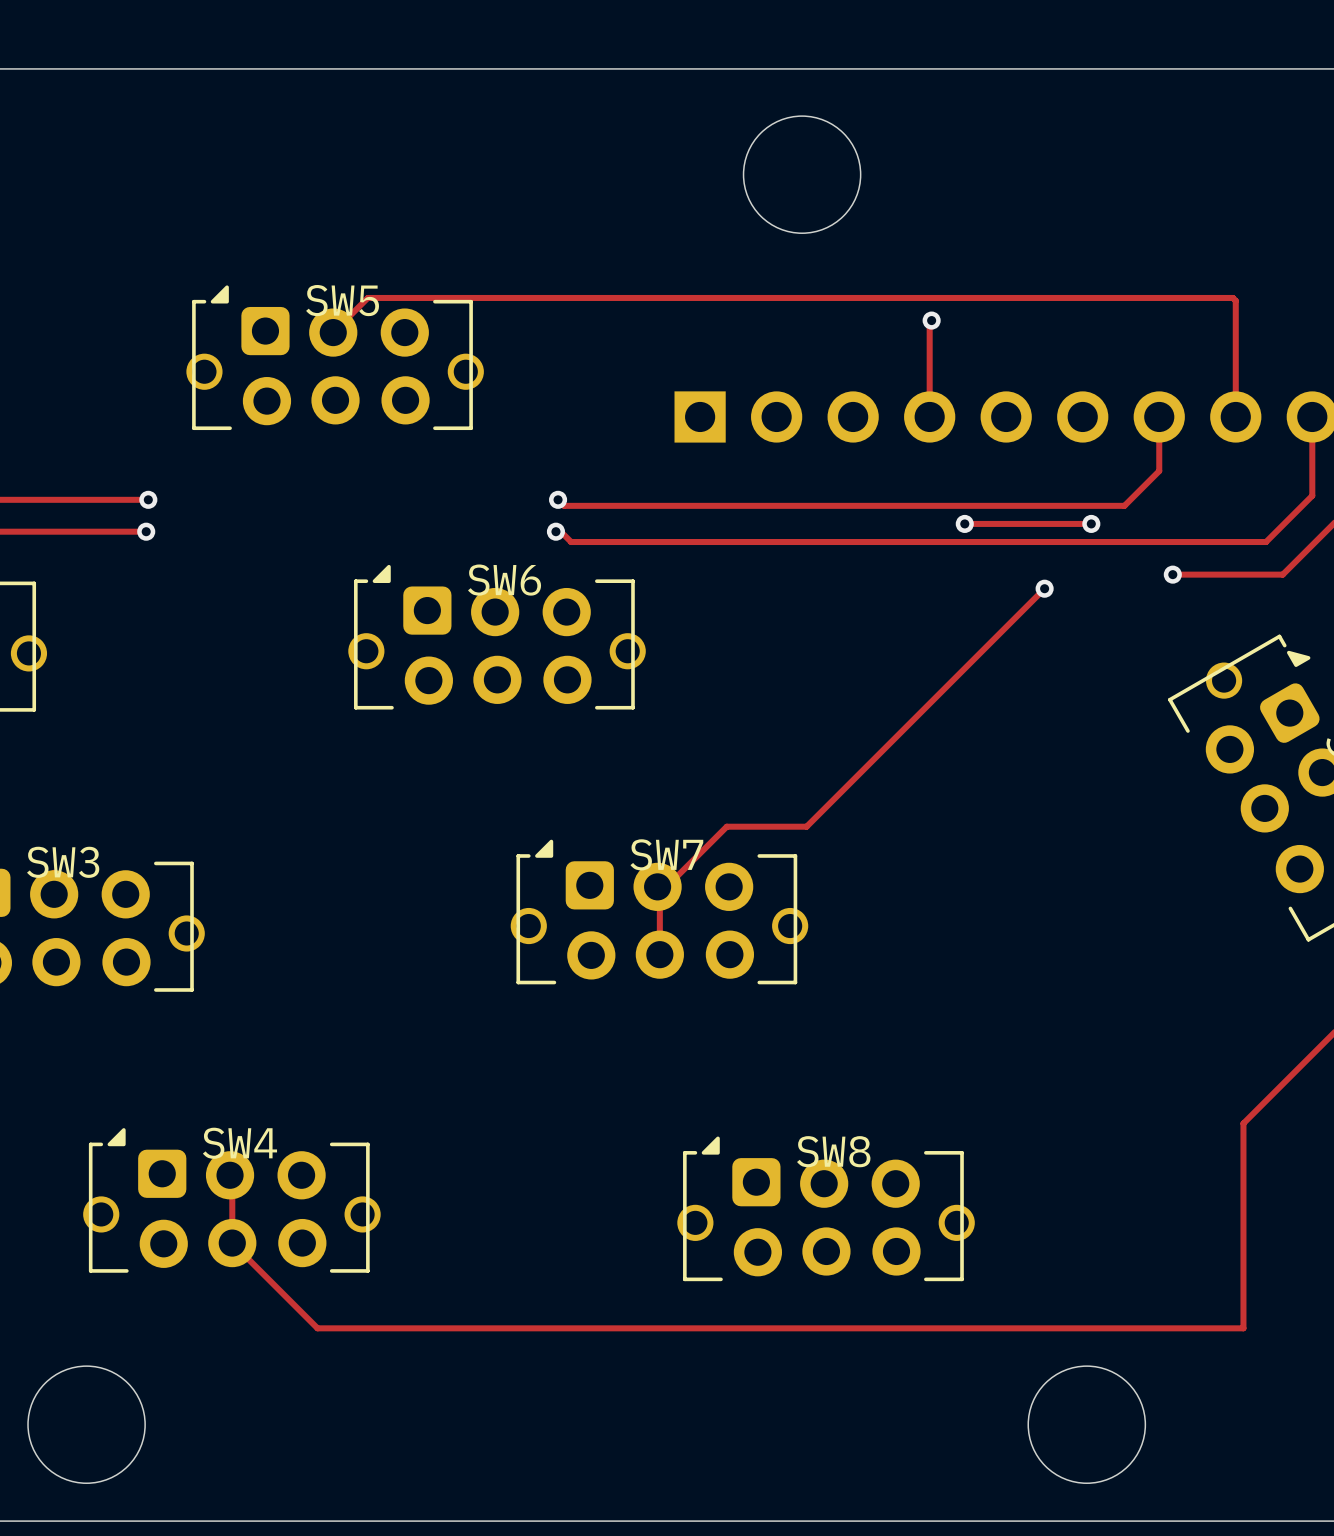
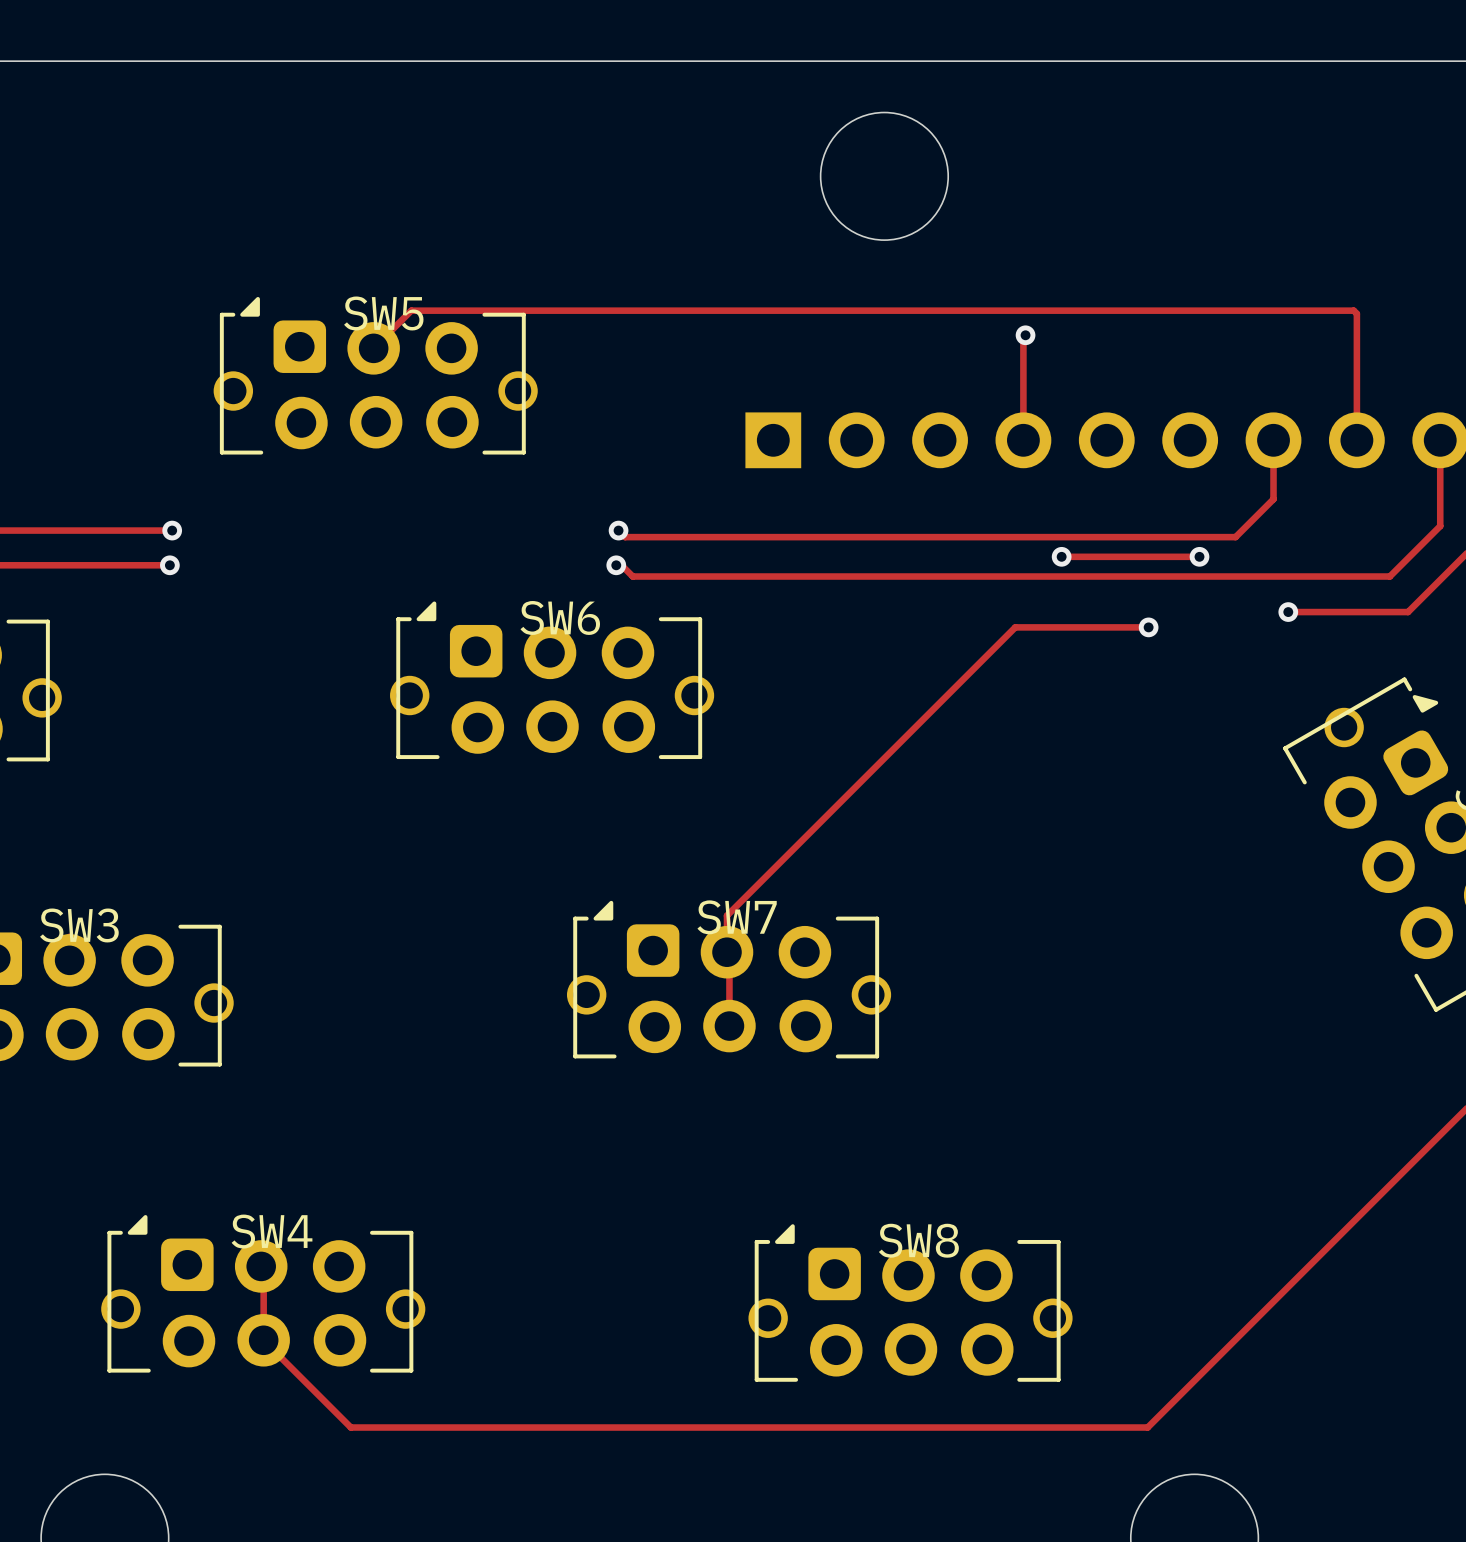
track: (1044, 588) (806, 826) (726, 826) (666, 886) (657, 886) -> (1148, 627) (1015, 627) (726, 915) (726, 952)
track: (1243, 1123) (1243, 1328) (317, 1328) (312, 1323) -> (1365, 1209) (1147, 1427) (350, 1427)

